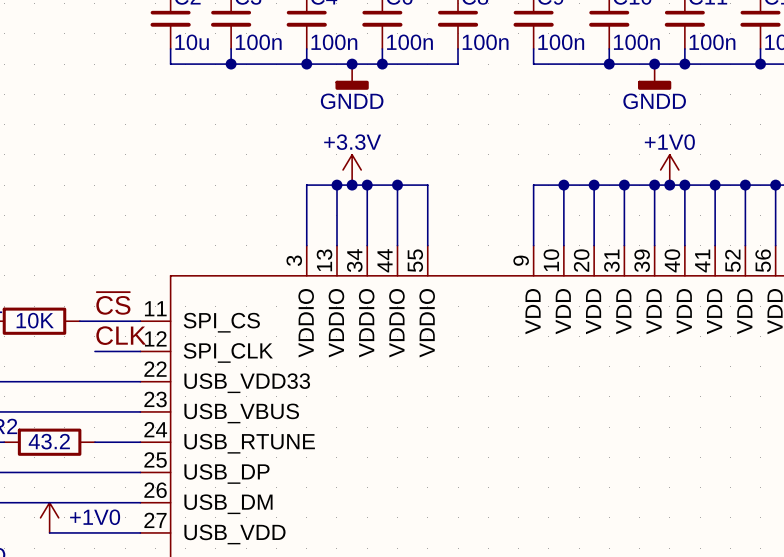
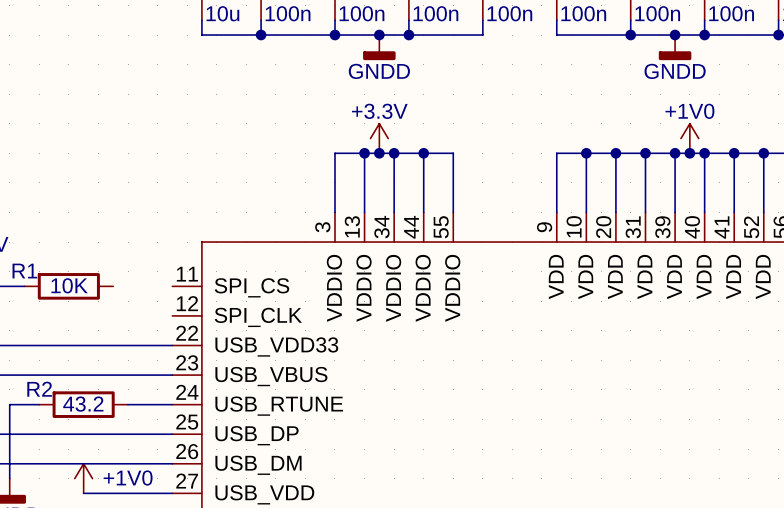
label: ~{CS} (113, 303) -> none
wire: (79, 321) (140, 321) -> none
label: CLK (121, 335) -> none
wire: (94, 351) (140, 351) -> none

